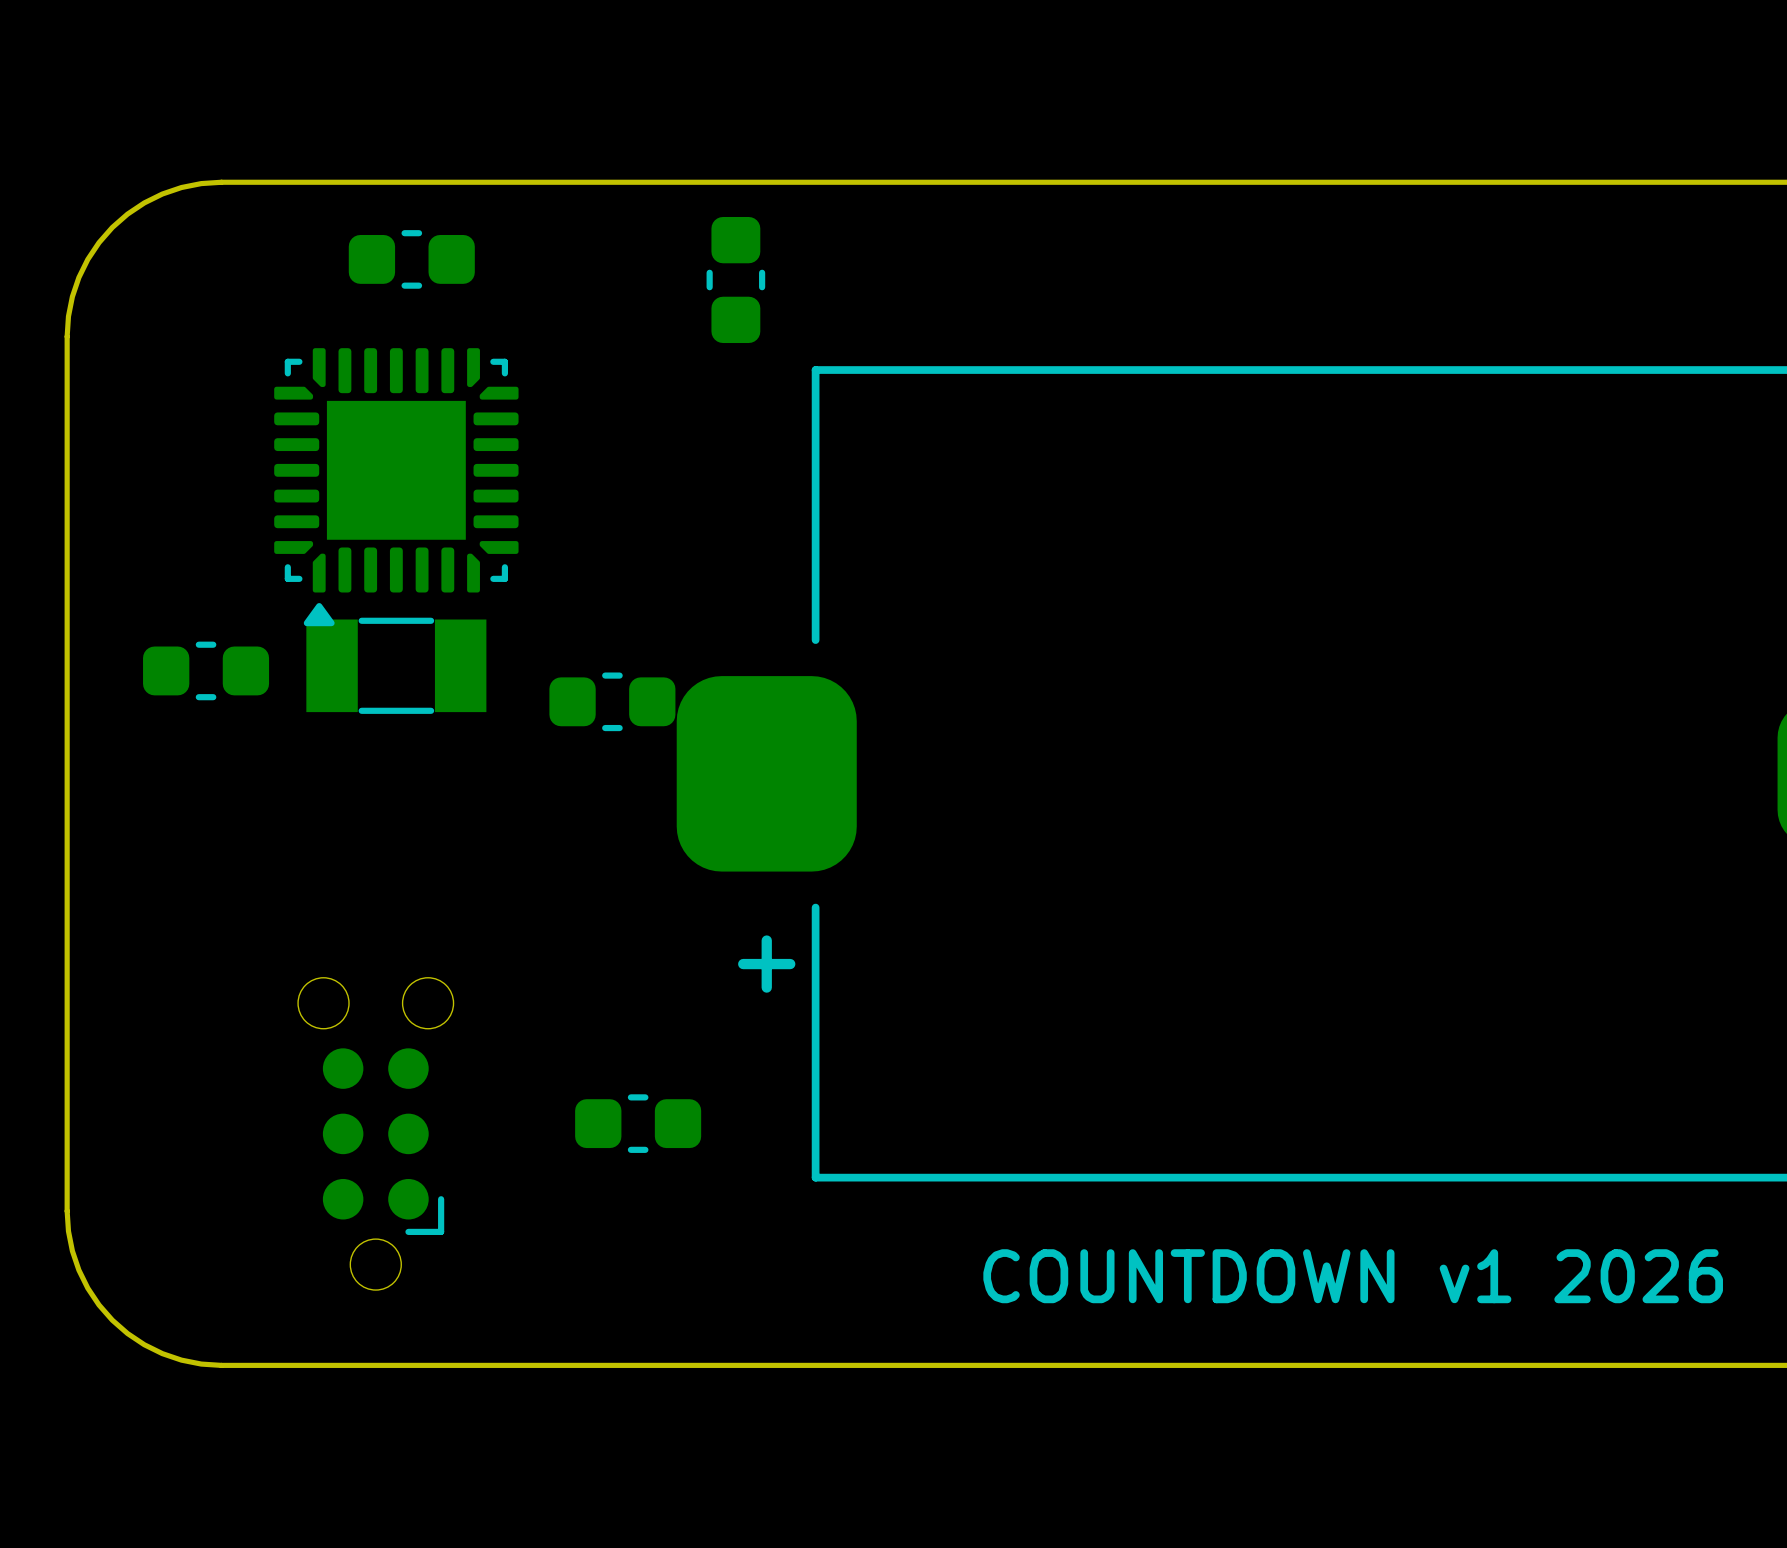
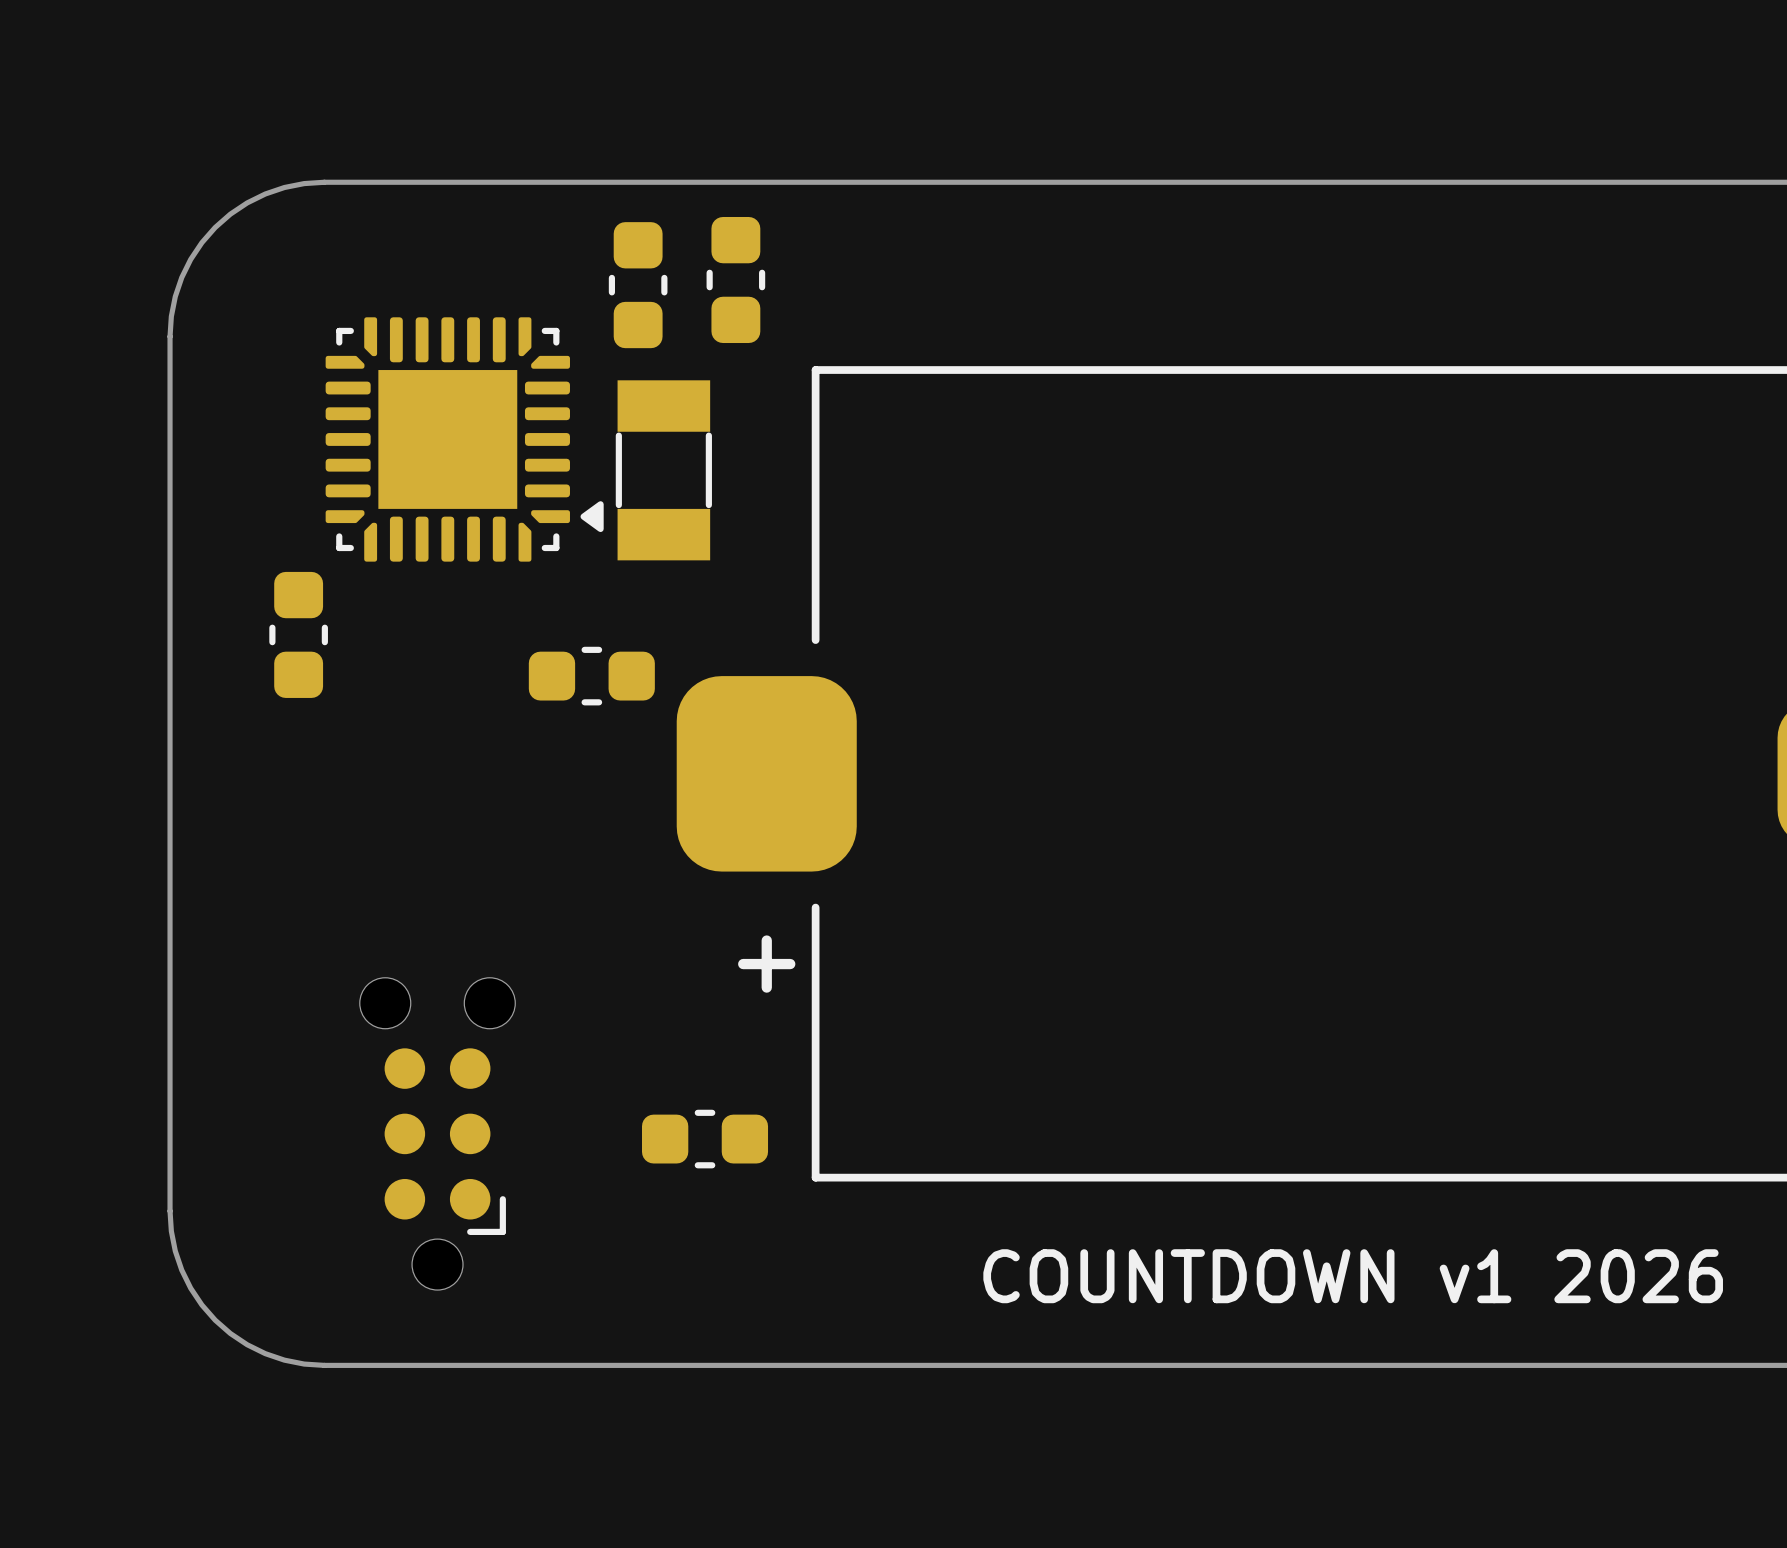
board edge: (324, 182) (201, 183) (162, 194) (144, 202) (112, 227) (87, 259) (72, 296) (67, 336) (67, 1211) (72, 1251) (78, 1270) (99, 1305) (127, 1333) (162, 1353) (201, 1364) (324, 1365) -> (324, 182) (304, 183) (265, 194) (247, 202) (215, 227) (190, 259) (181, 277) (171, 316) (170, 336) (171, 1231) (175, 1251) (190, 1288) (215, 1320) (230, 1333) (265, 1353) (284, 1360) (324, 1365)
part: (411, 259) -> none
part: none -> (638, 285)
part rotation: 0° (396, 487) -> 90° counterclockwise (464, 439)
part rotation: 0° (396, 665) -> 90° clockwise (663, 470)
part position: (396, 665) -> (663, 470)
part rotation: 0° (206, 670) -> 90° clockwise (298, 634)
part position: (206, 670) -> (298, 634)
part position: (612, 701) -> (591, 676)
part position: (638, 1123) -> (705, 1139)
part position: (375, 1133) -> (437, 1133)

